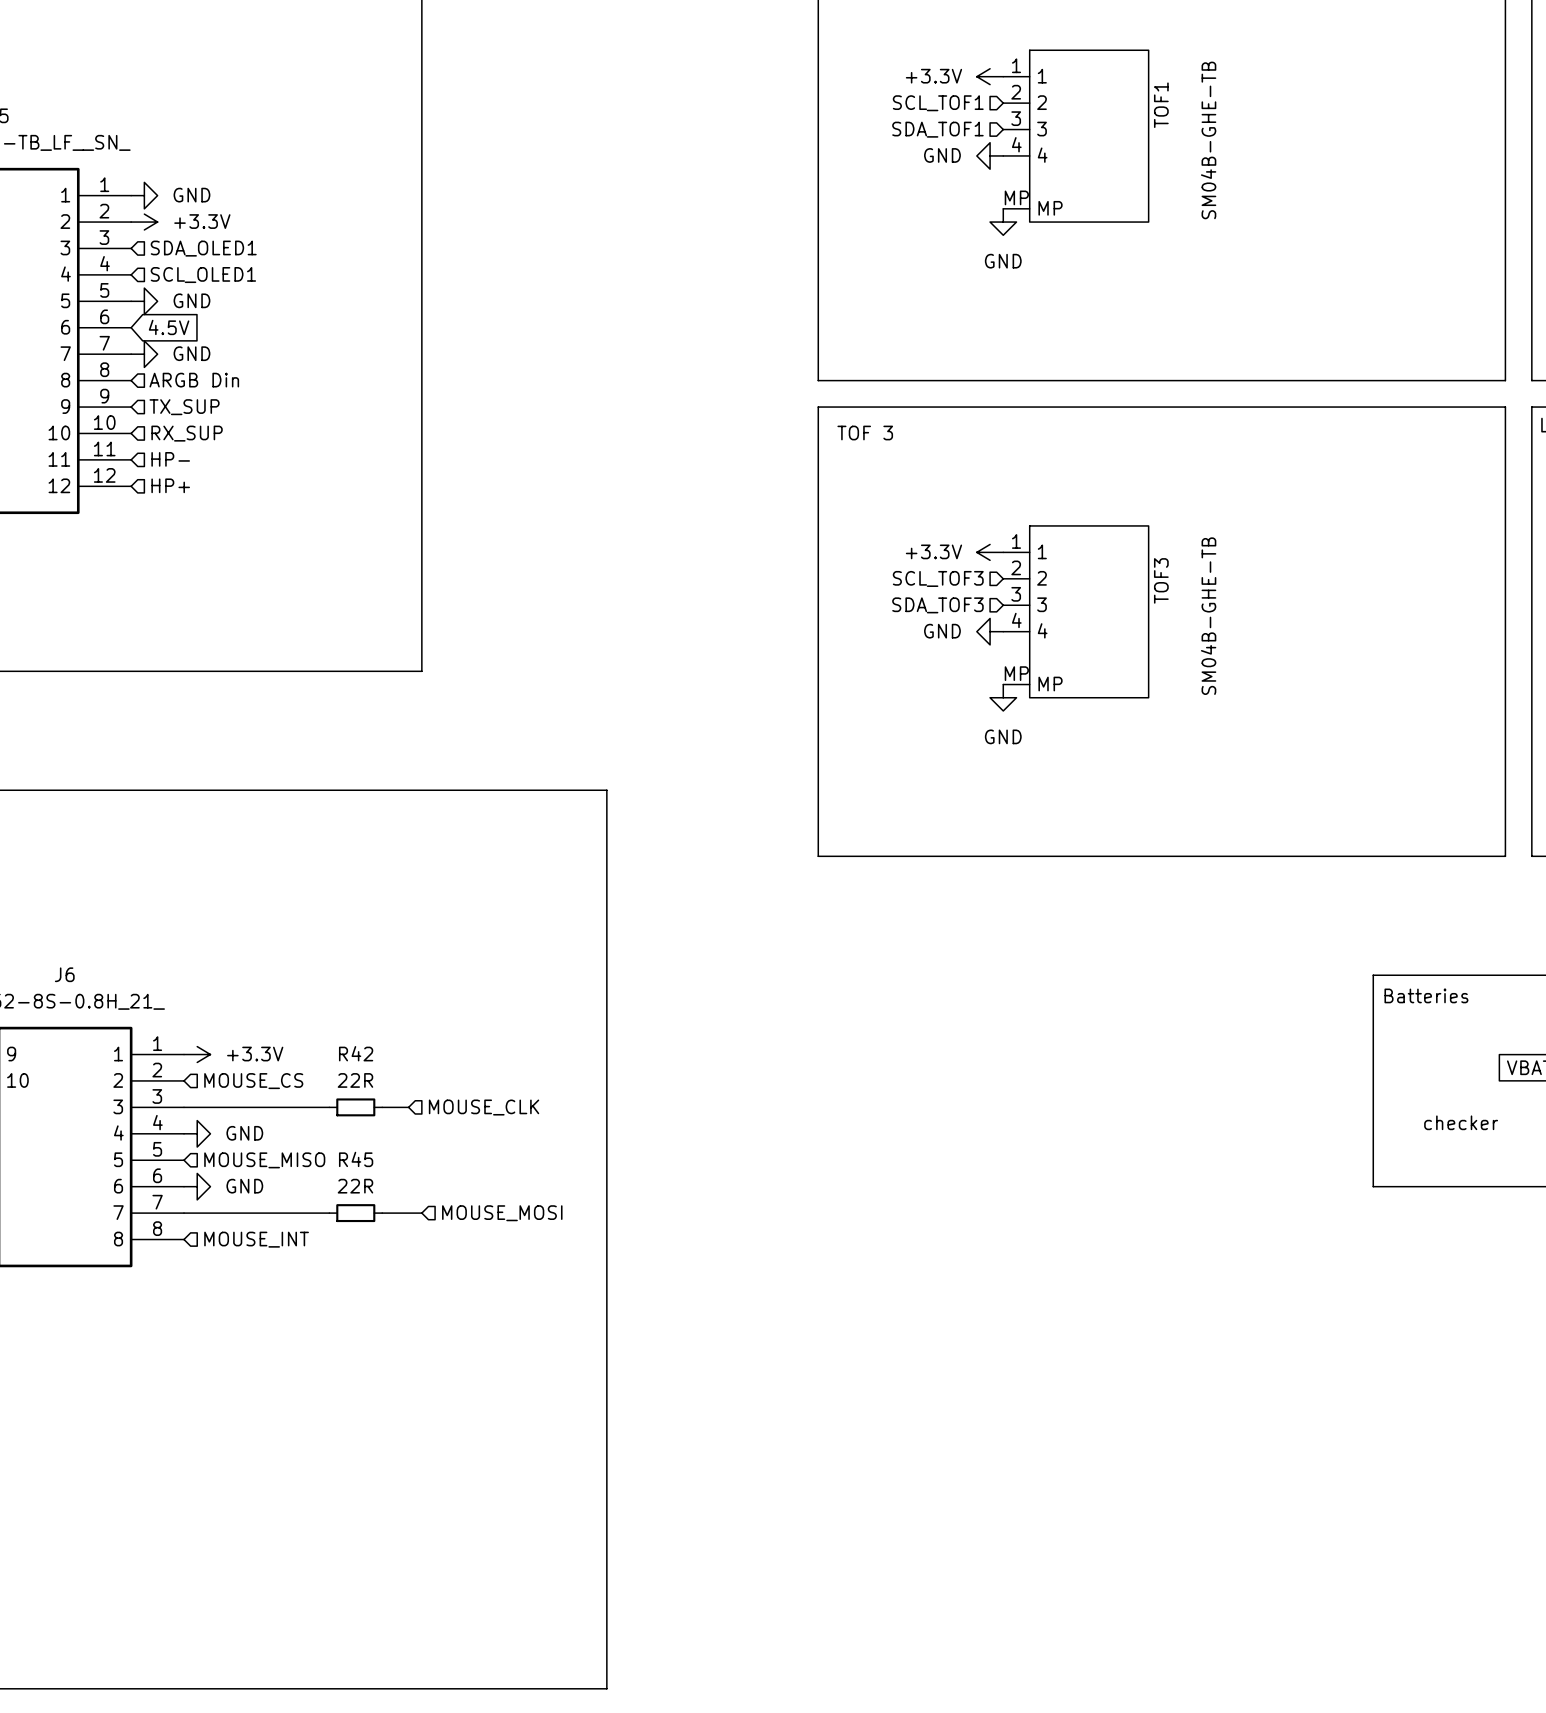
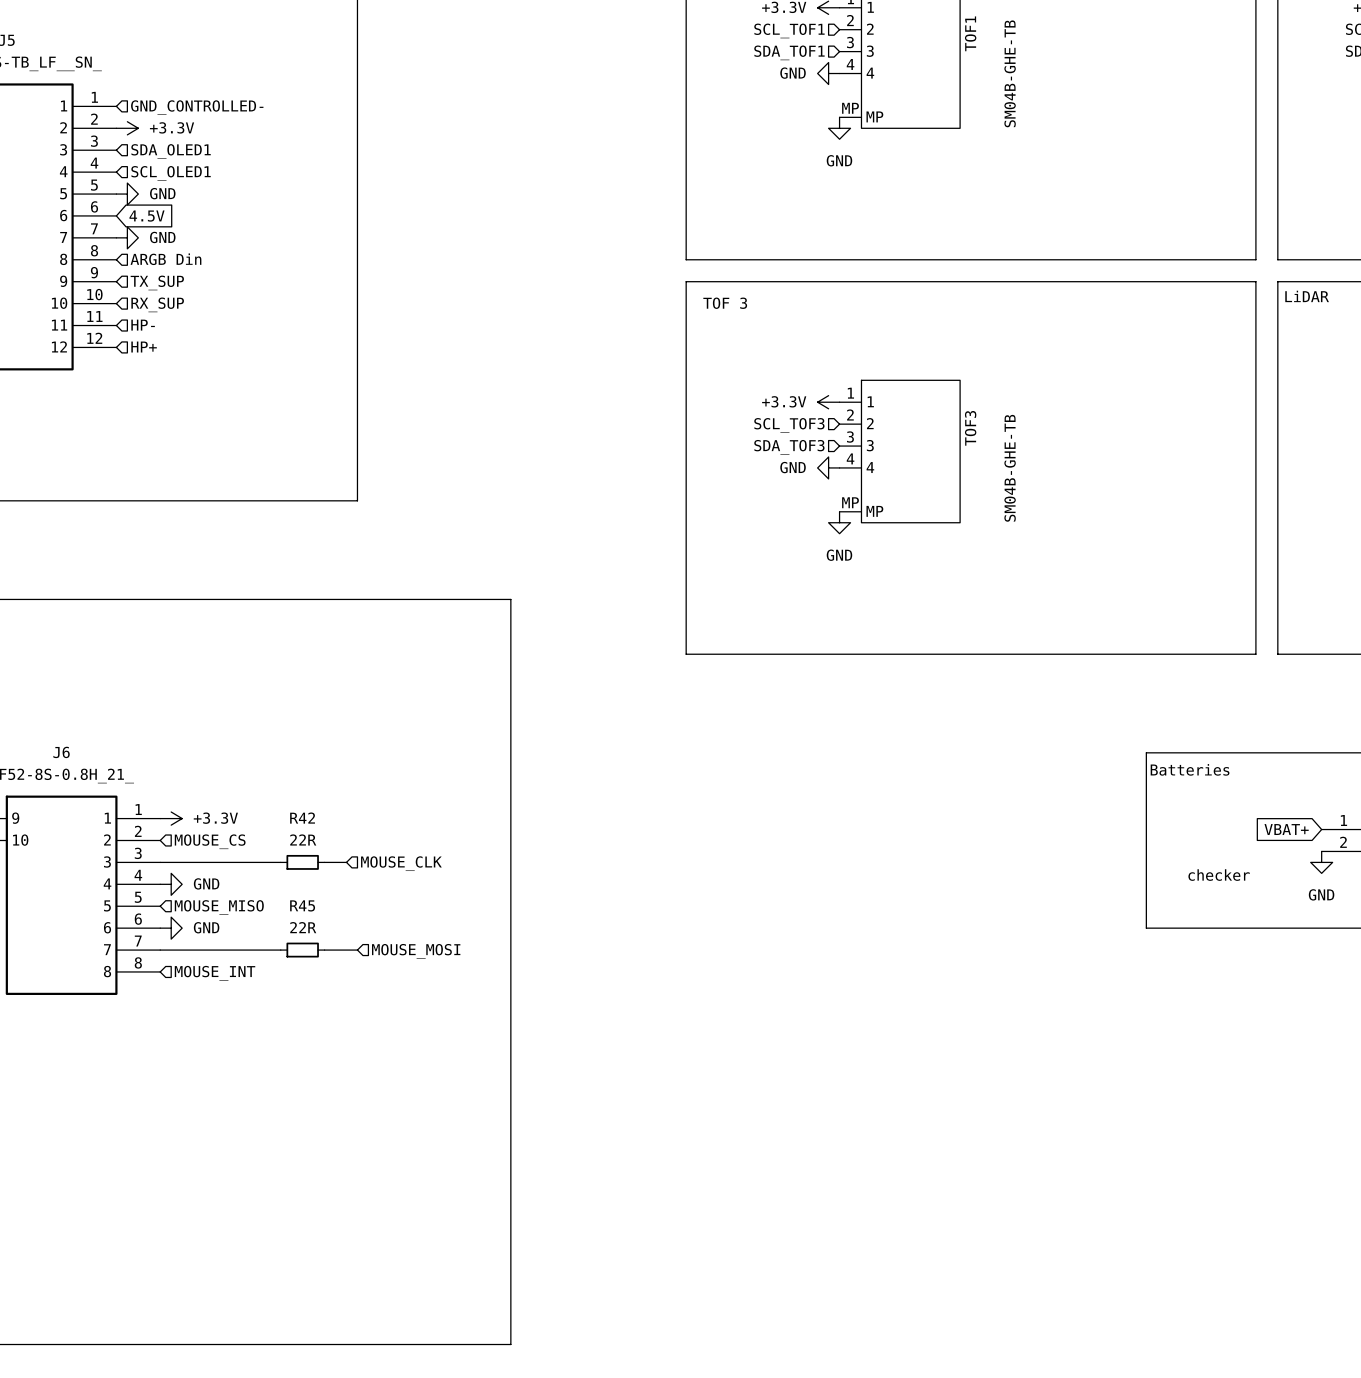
power symbol: GND (144, 195) -> none
hierarchical label: none -> GND_CONTROLLED- (197, 107)

